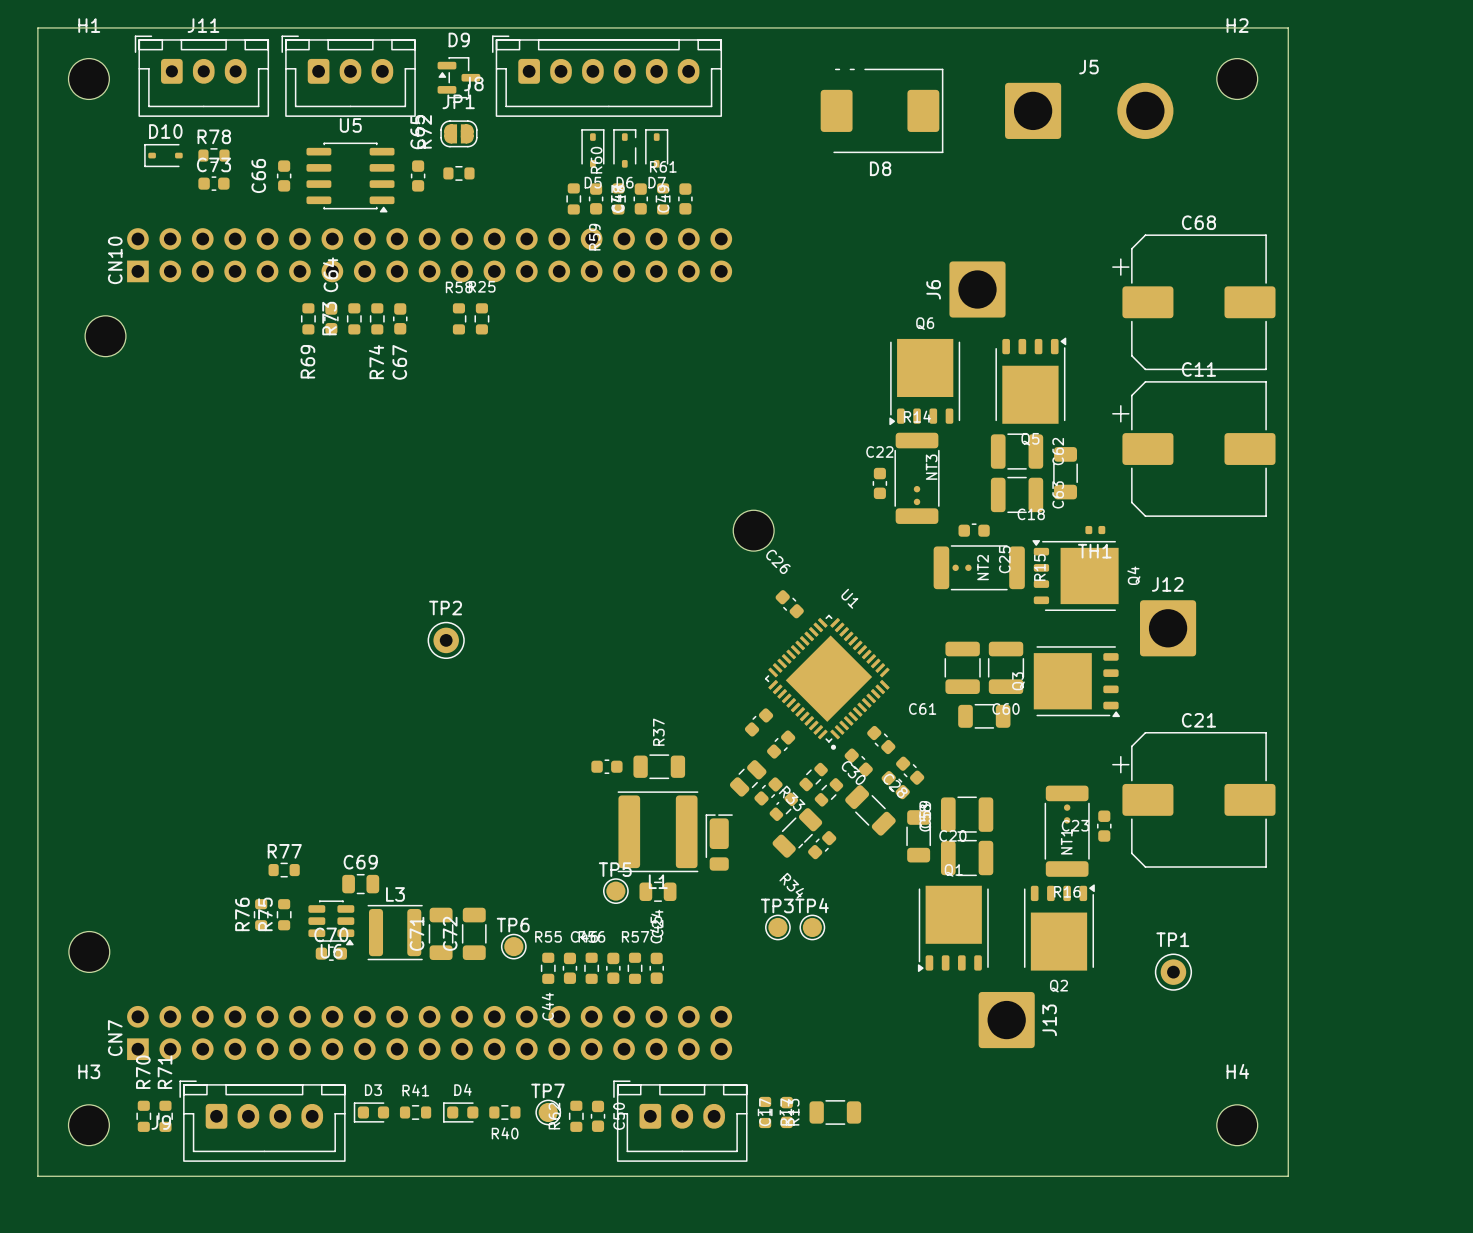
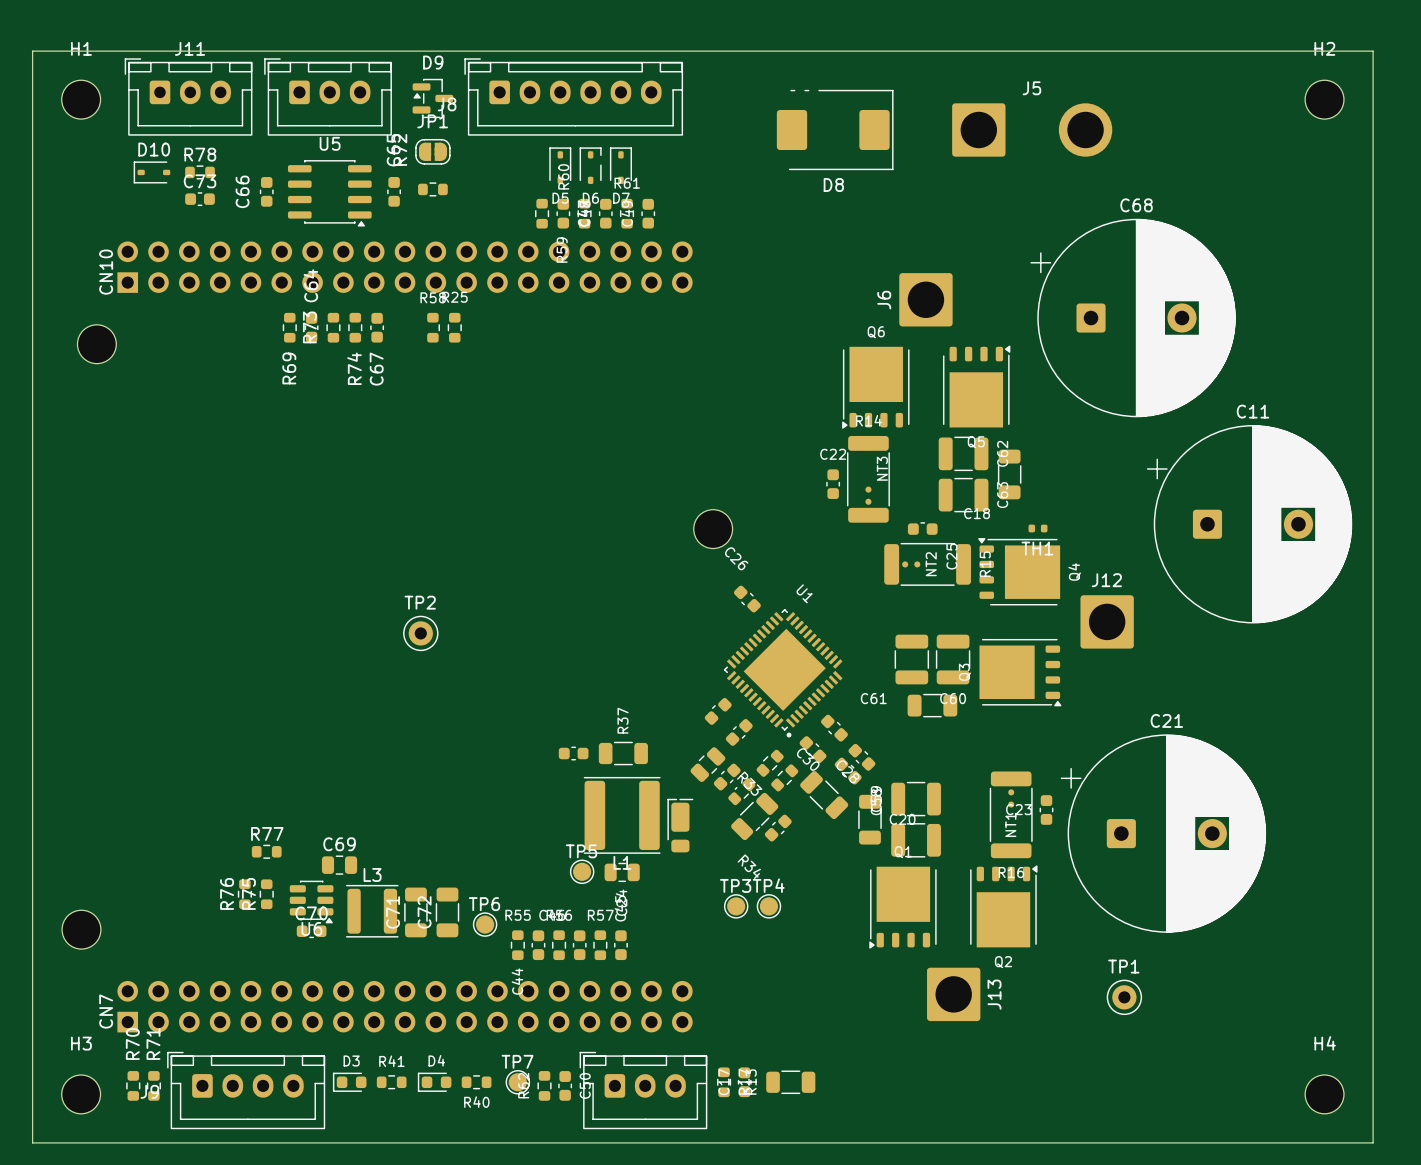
board edge: (1288, 27) (1288, 1176) -> (1221, 51) (1373, 51) (1373, 1142) (1221, 1142)
H2 position: (1237, 79) -> (1324, 99)
C68 name position: C68 (1198, 222) -> C68 (1136, 205)
C68 footprint: [1112, 234, 1276, 371] -> [1030, 218, 1236, 418]
C11 name position: C11 (1198, 369) -> C11 (1252, 411)
C11 footprint: [1112, 381, 1276, 517] -> [1146, 425, 1353, 624]
C21 name position: C21 (1198, 720) -> C21 (1166, 720)
C21 footprint: [1112, 732, 1276, 868] -> [1060, 734, 1267, 933]
TP1 position: (1173, 972) -> (1124, 997)
H4 position: (1237, 1125) -> (1324, 1094)

